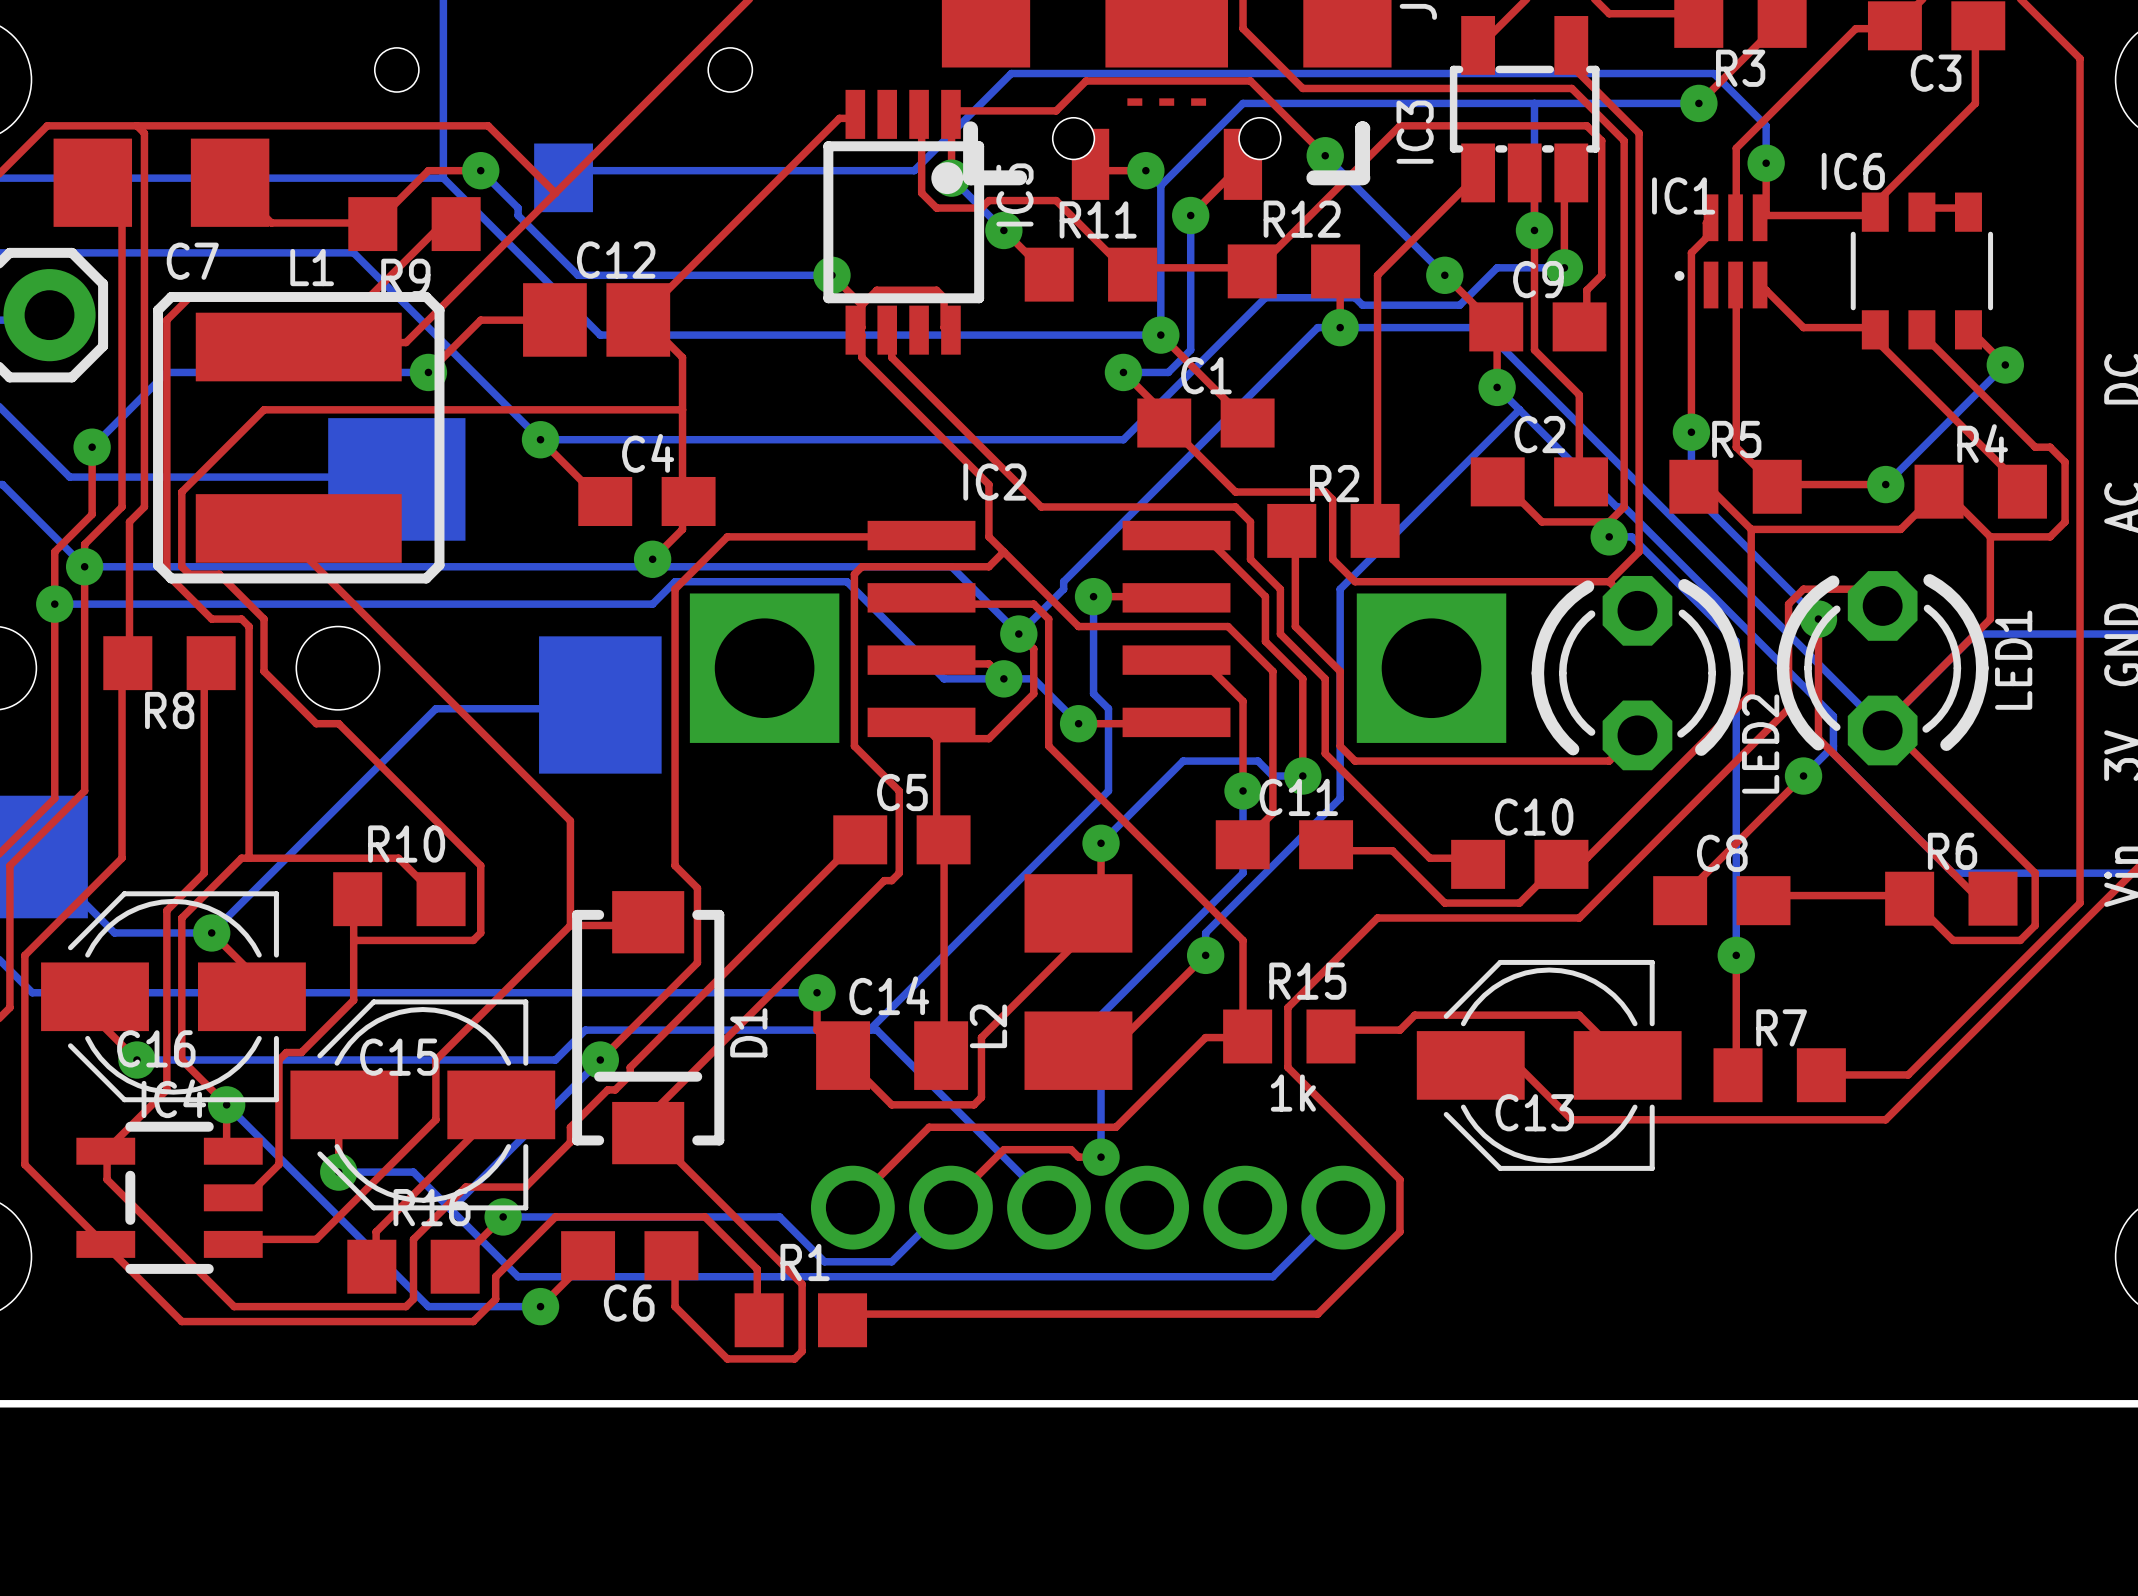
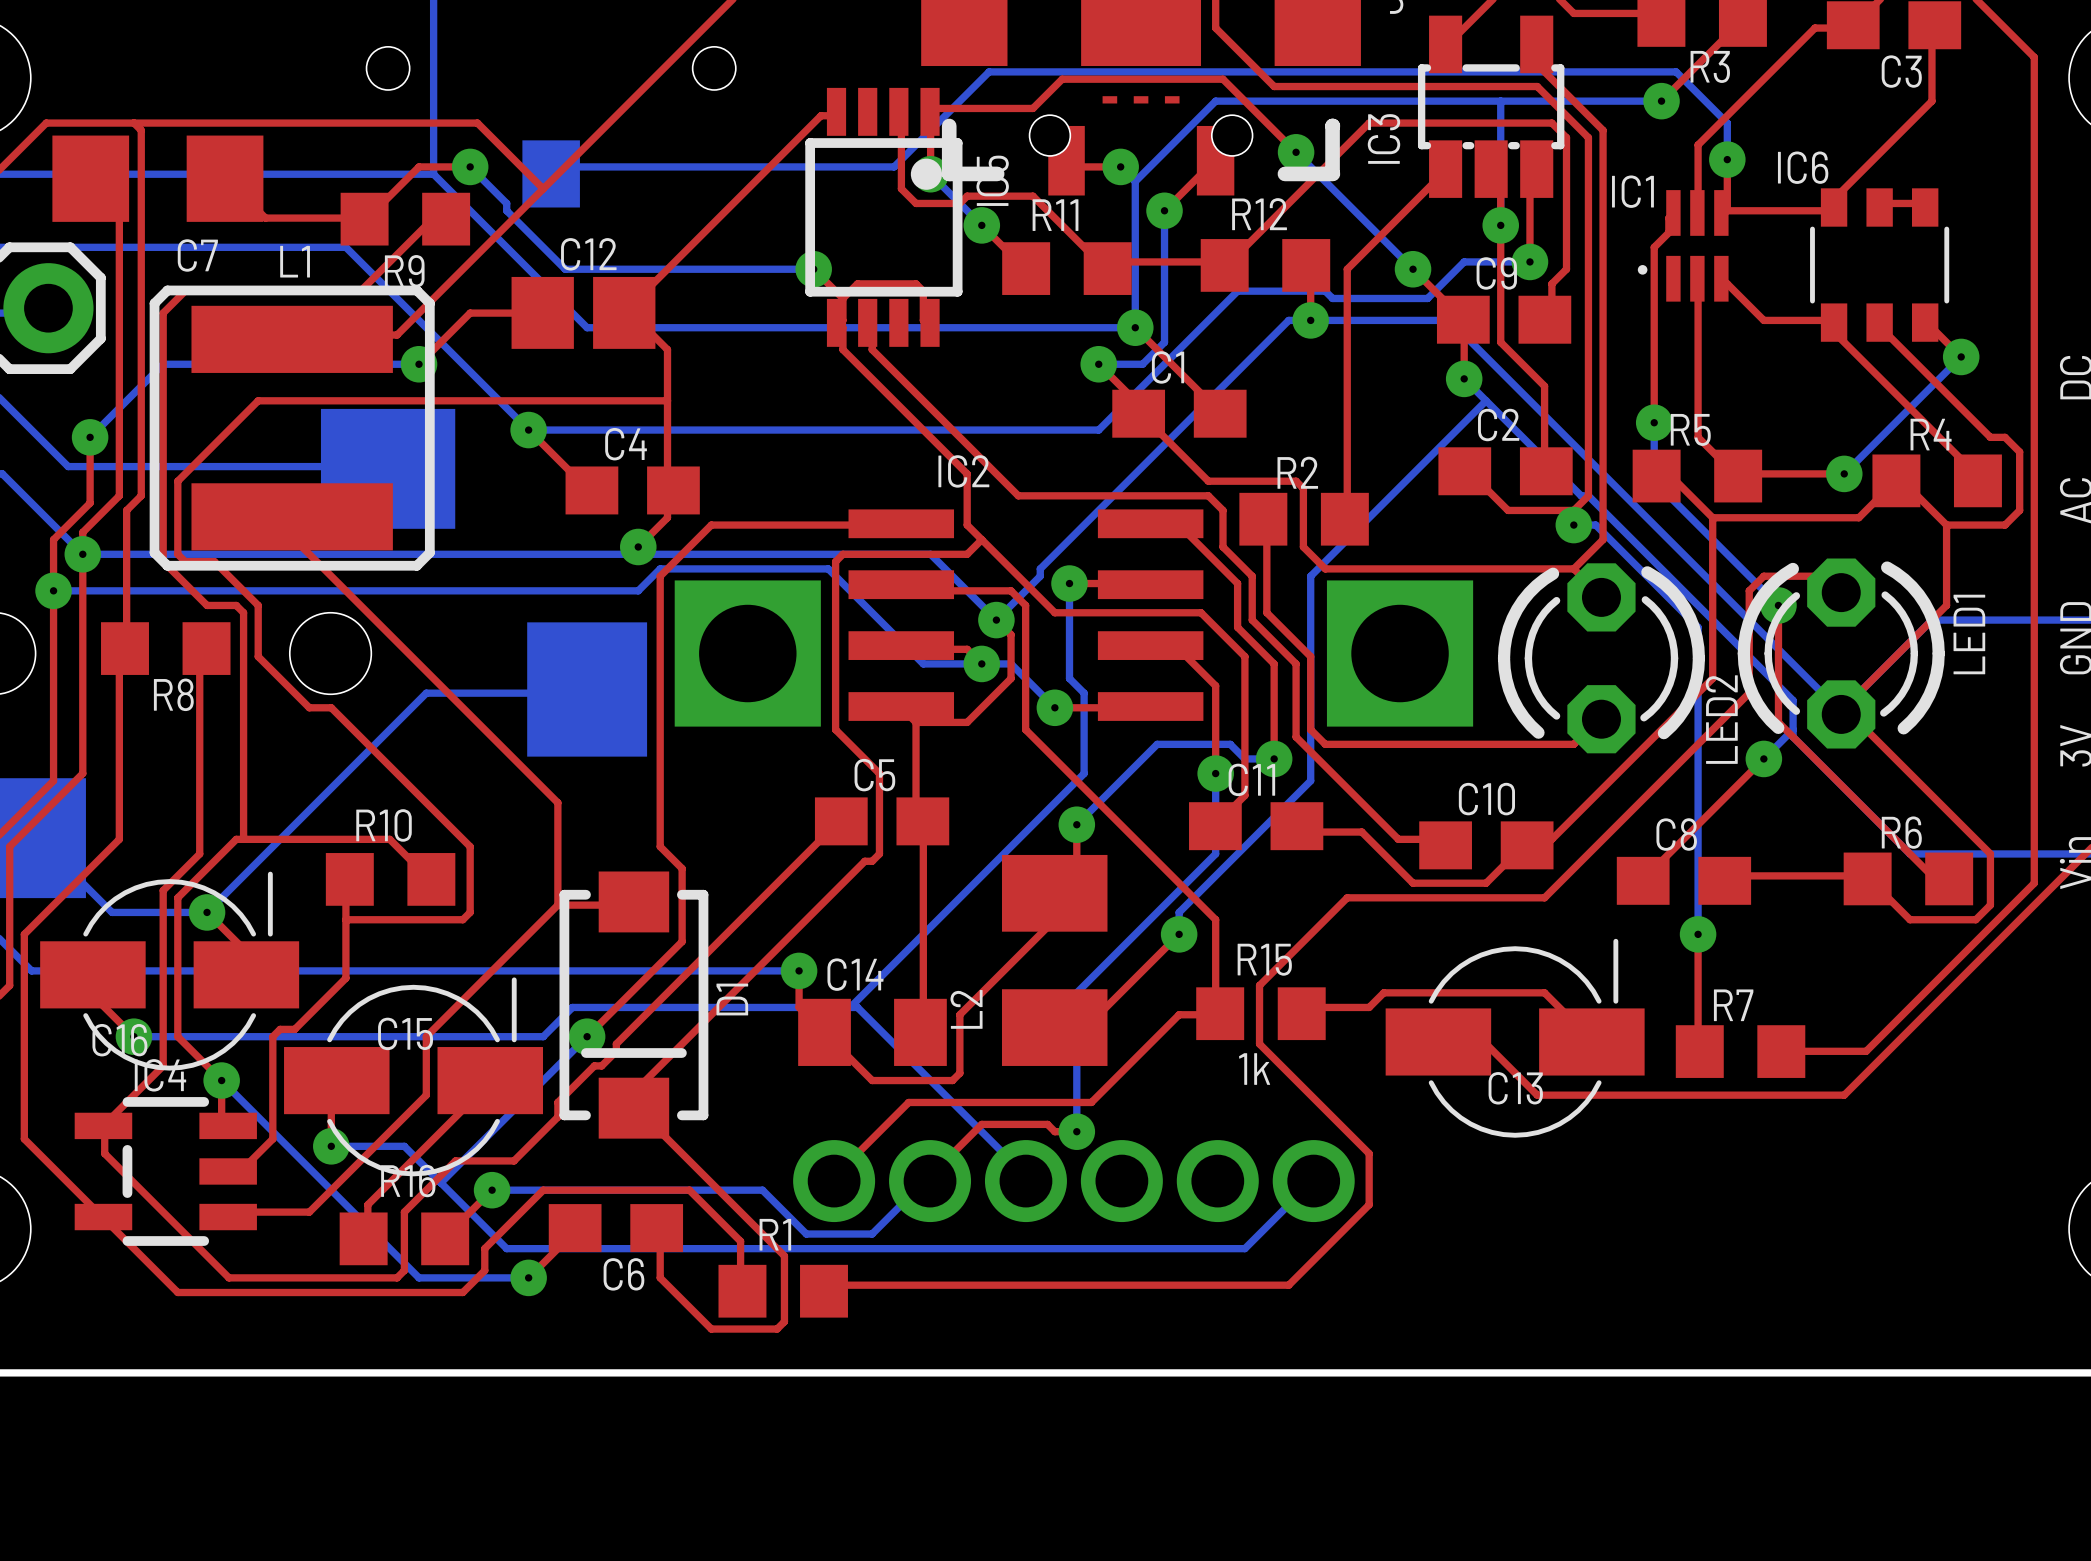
C16 footprint: [41, 891, 306, 1103] -> [40, 871, 300, 1071]
C13 footprint: [1416, 959, 1682, 1171] -> [1385, 938, 1645, 1138]
C15 footprint: [290, 999, 556, 1211] -> [284, 977, 544, 1177]

